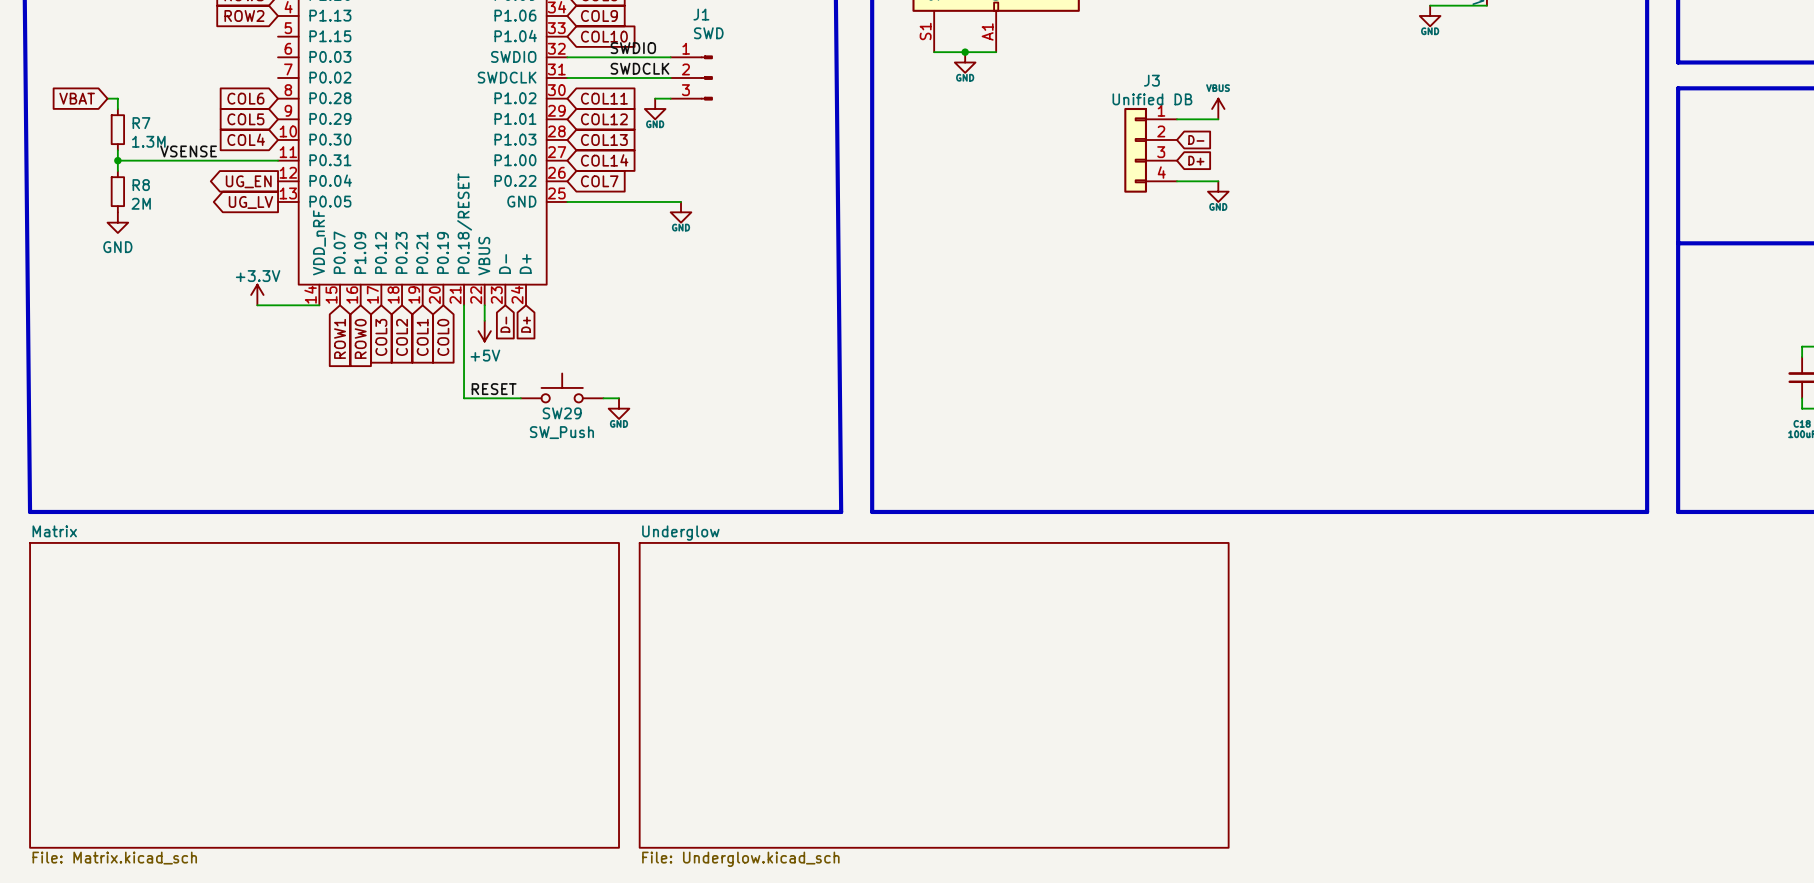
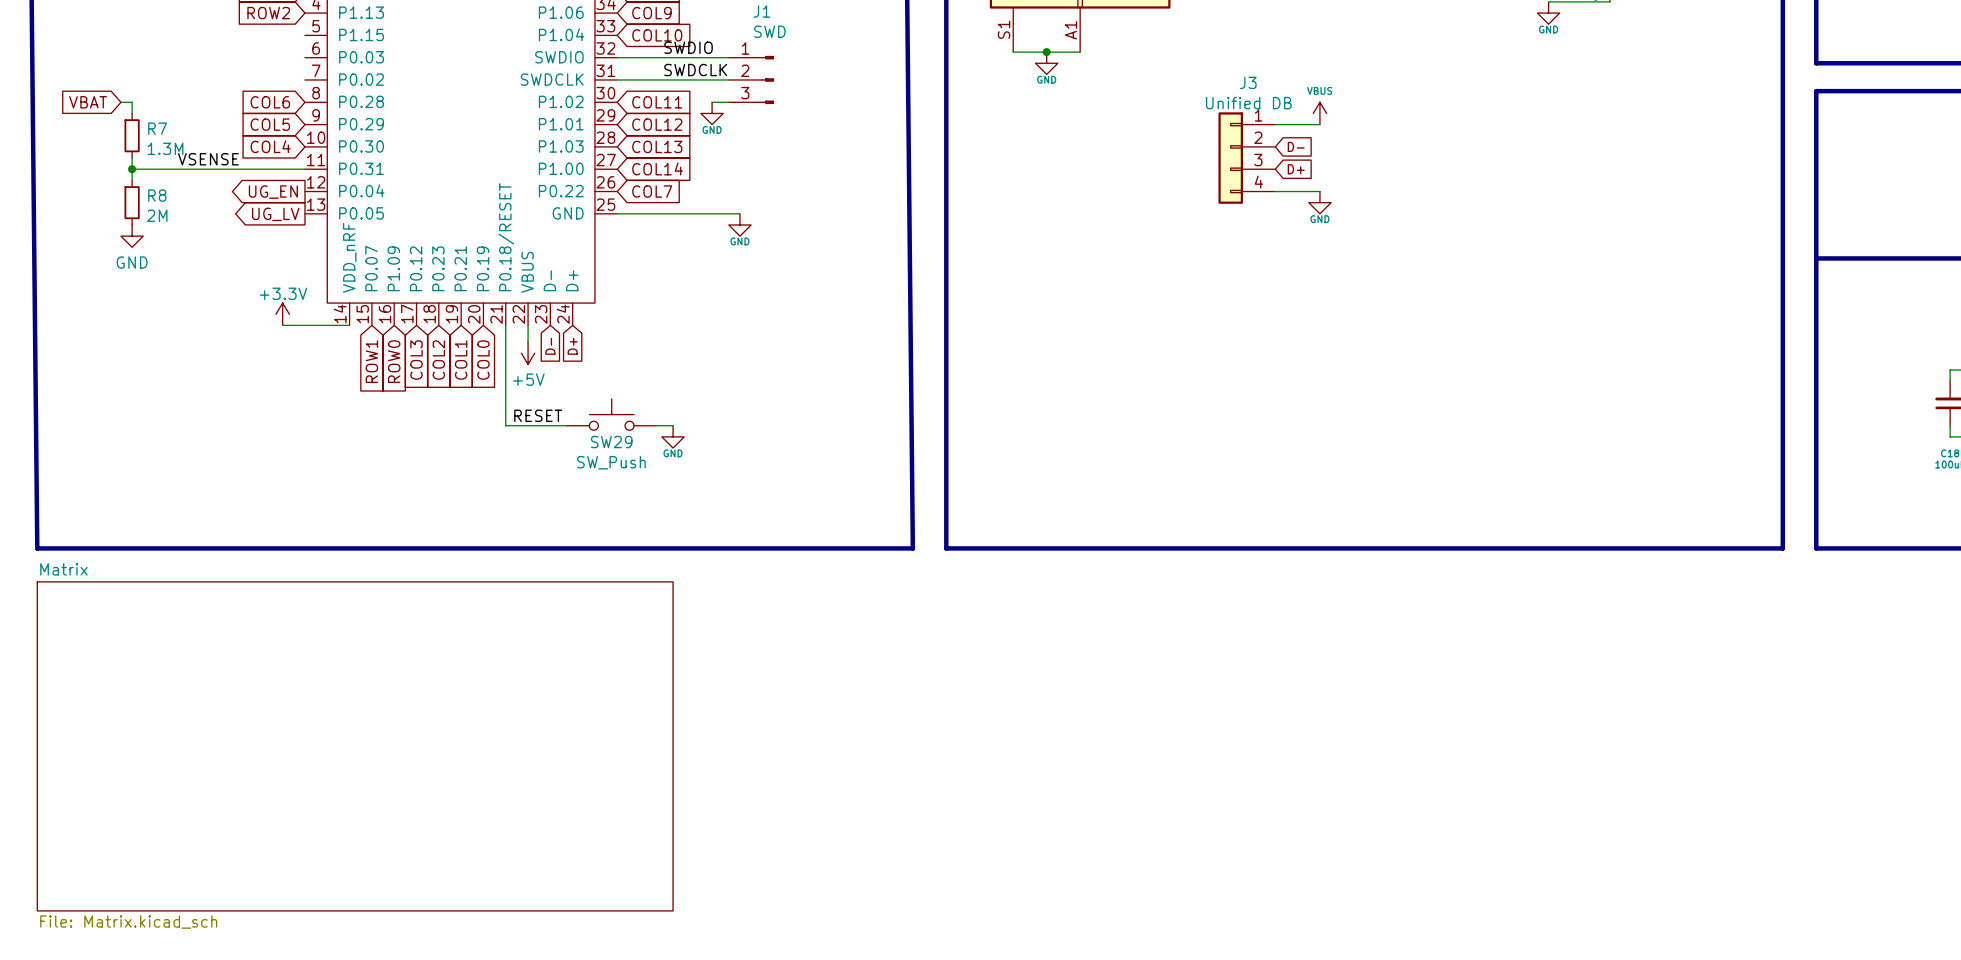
sheet Underglow: File: Underglow.kicad_sch (934, 695) -> none

